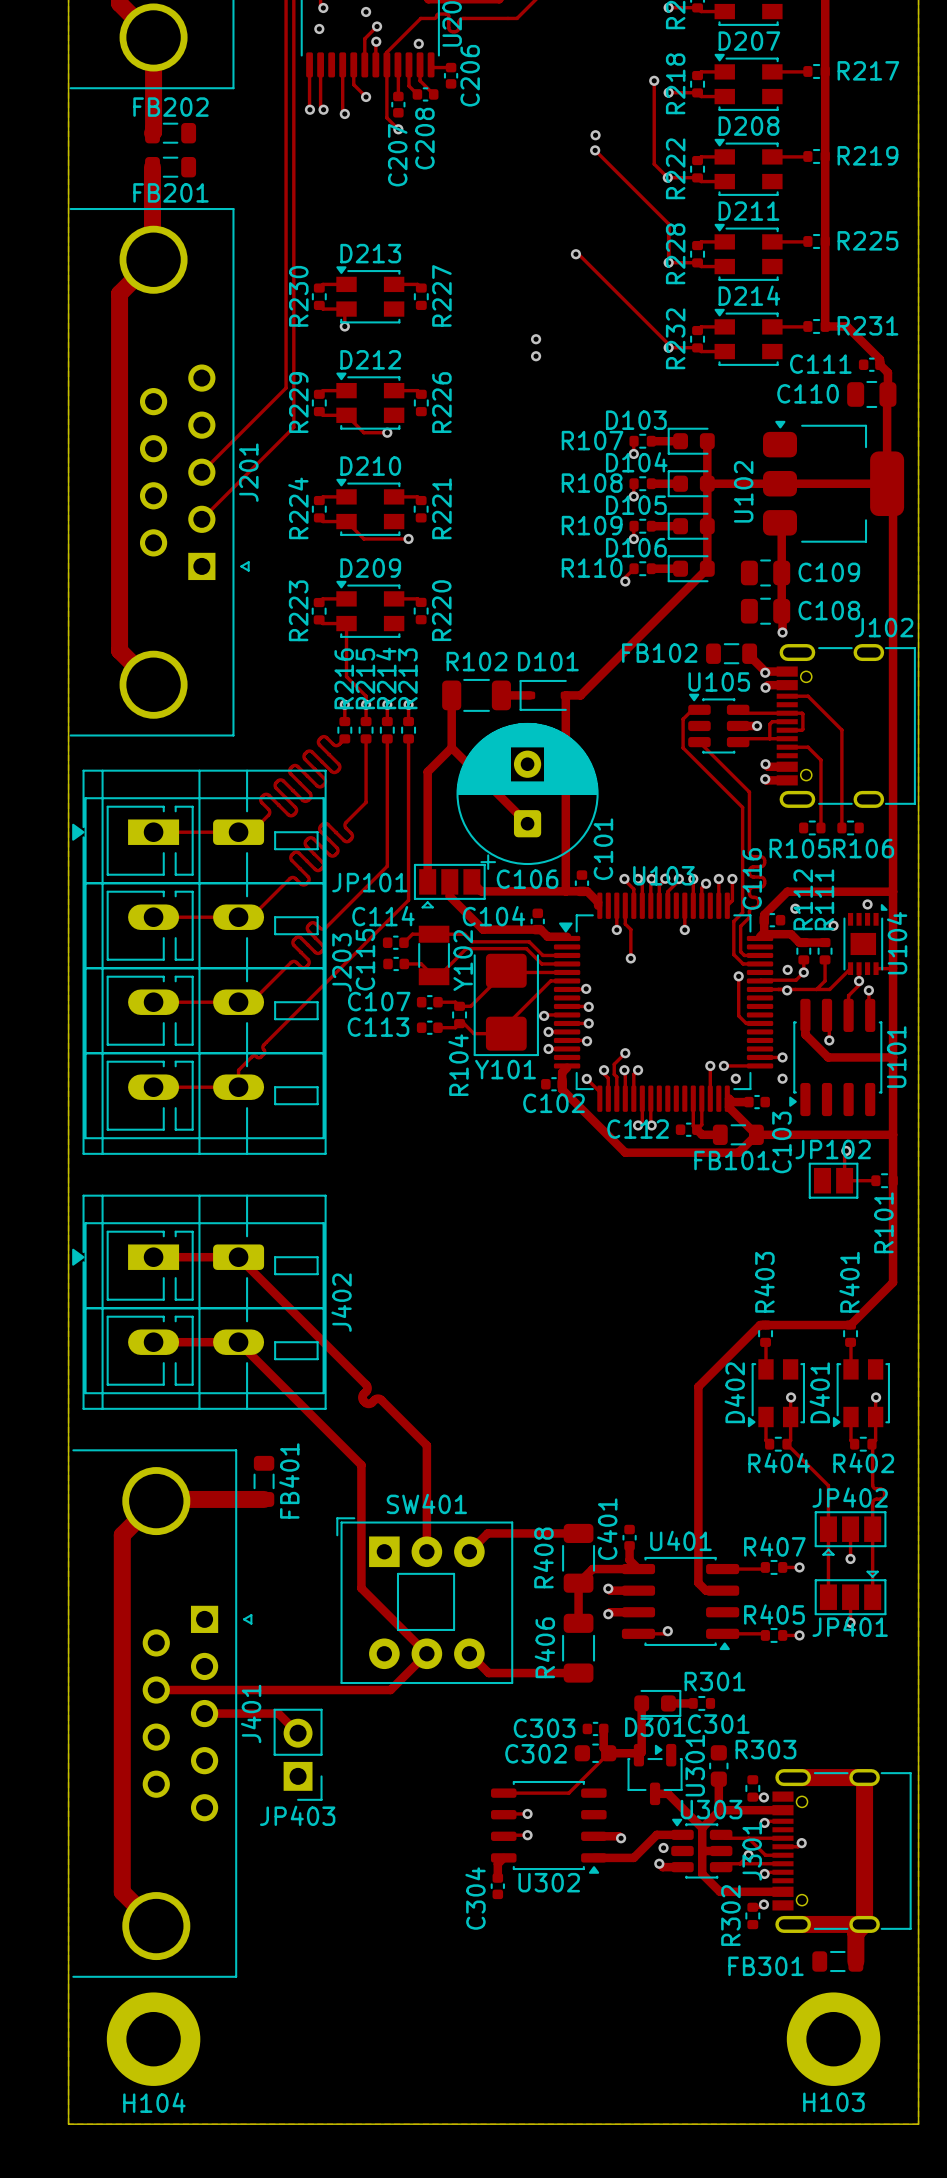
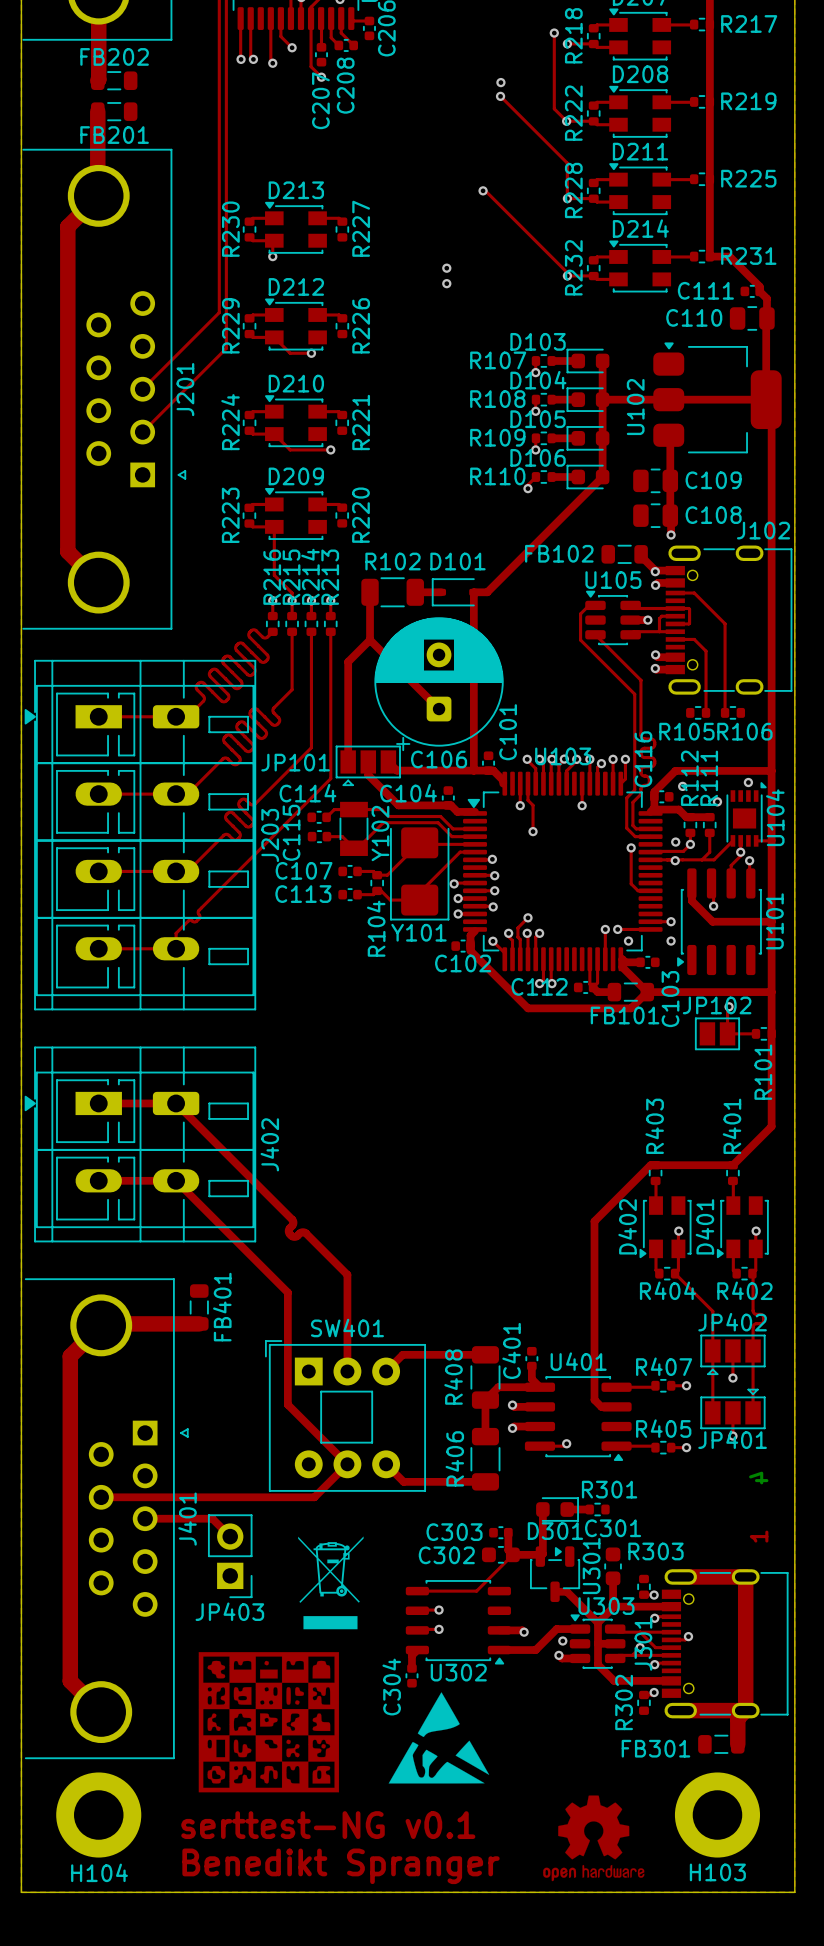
drawing: none -> [749, 1471, 769, 1543]
drawing: none -> [298, 1536, 364, 1630]
drawing: none -> [198, 1652, 340, 1793]
drawing: none -> [388, 1692, 490, 1784]
drawing: none -> [543, 1795, 645, 1882]
text: none -> serttest-NG v0.1 (328, 1825)
text: none -> Benedikt Spranger (341, 1866)

